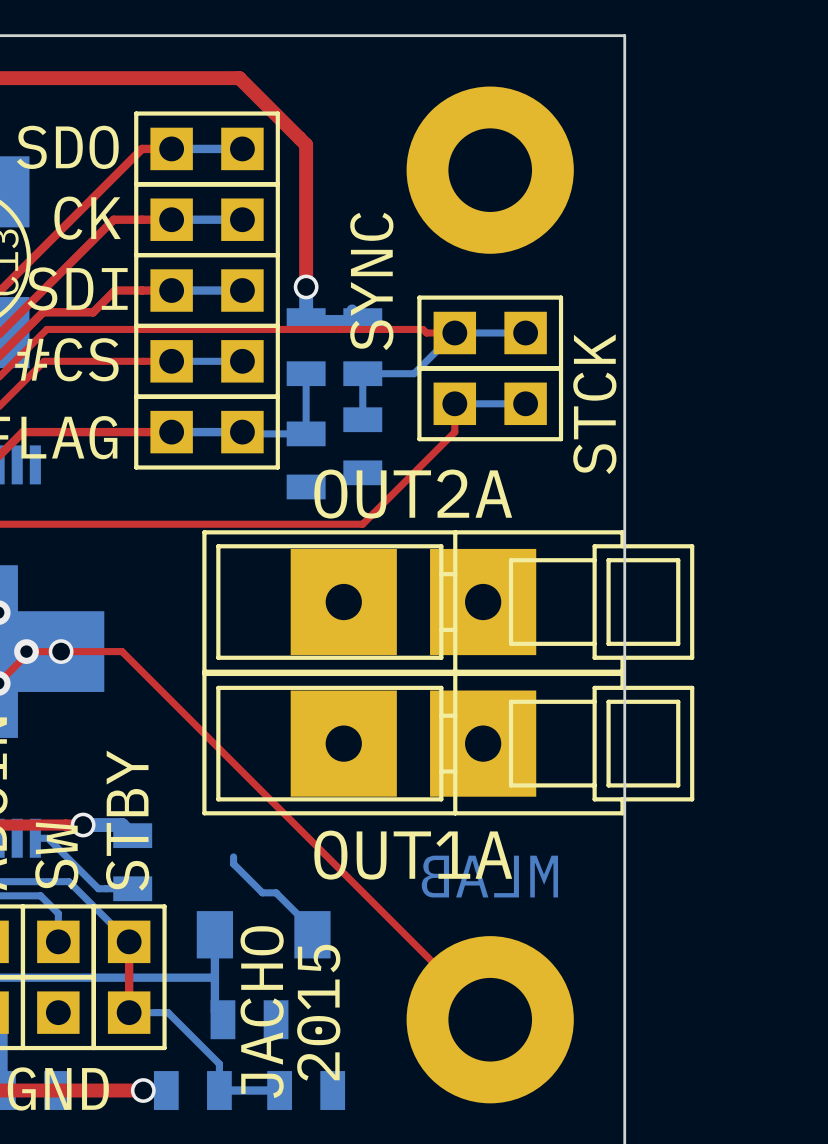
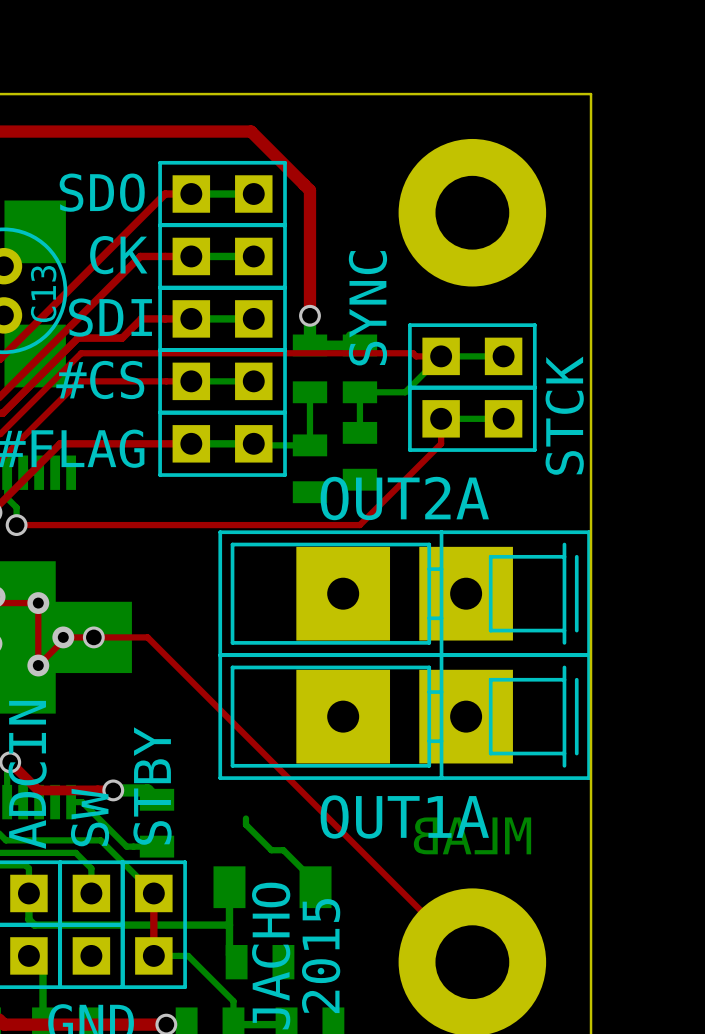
part: none -> (404, 593)
part: (448, 602) -> none
part: none -> (404, 716)
part: (448, 743) -> none

